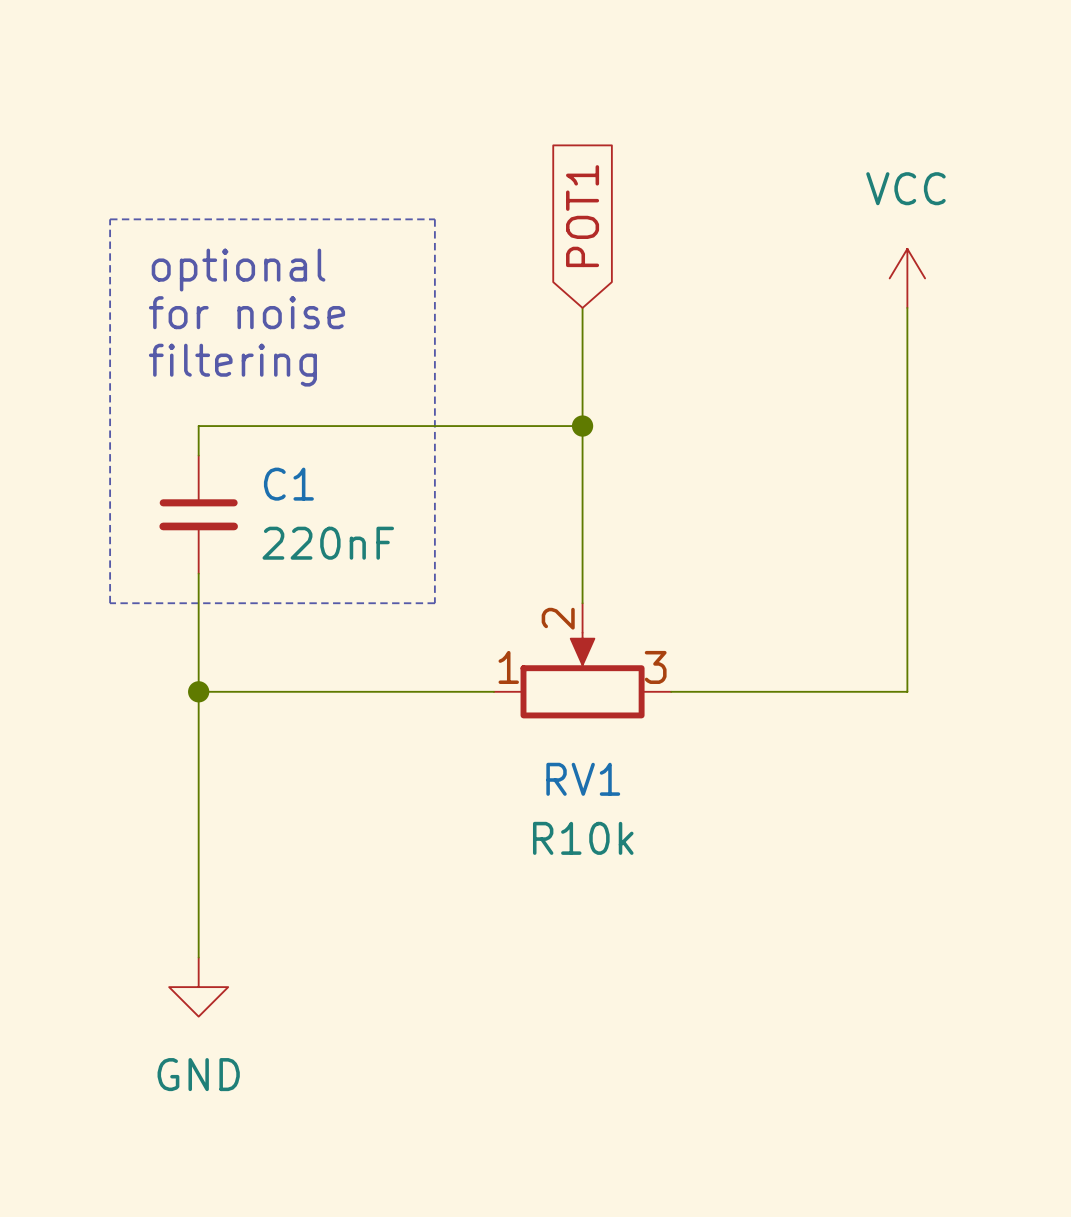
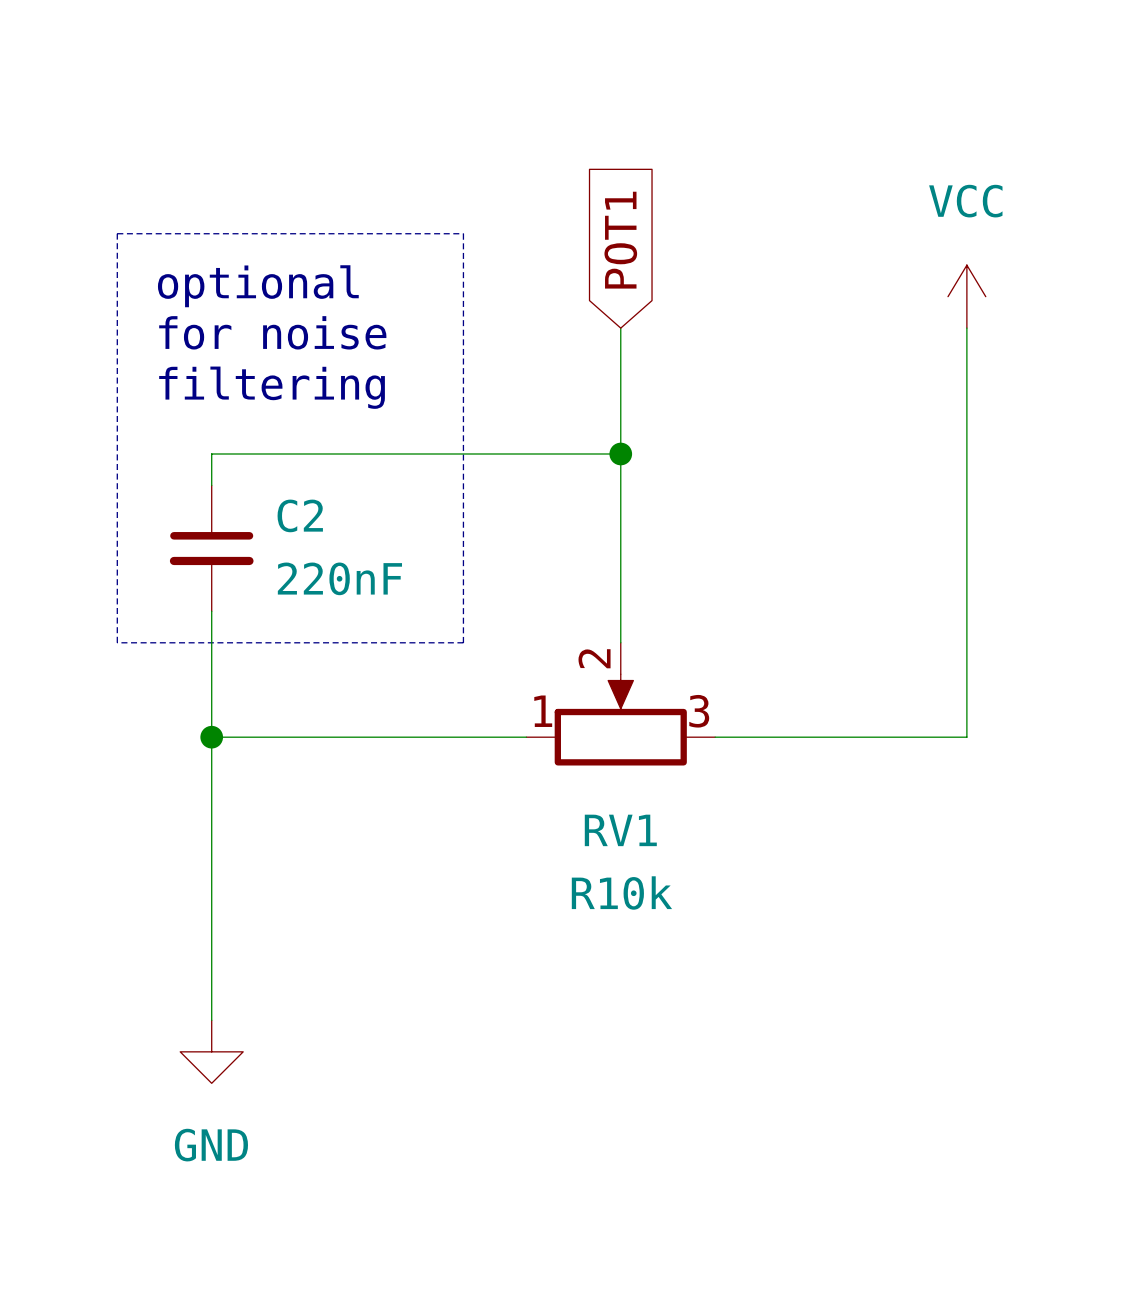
C1 name: C1 (288, 484) -> C2 (300, 515)

